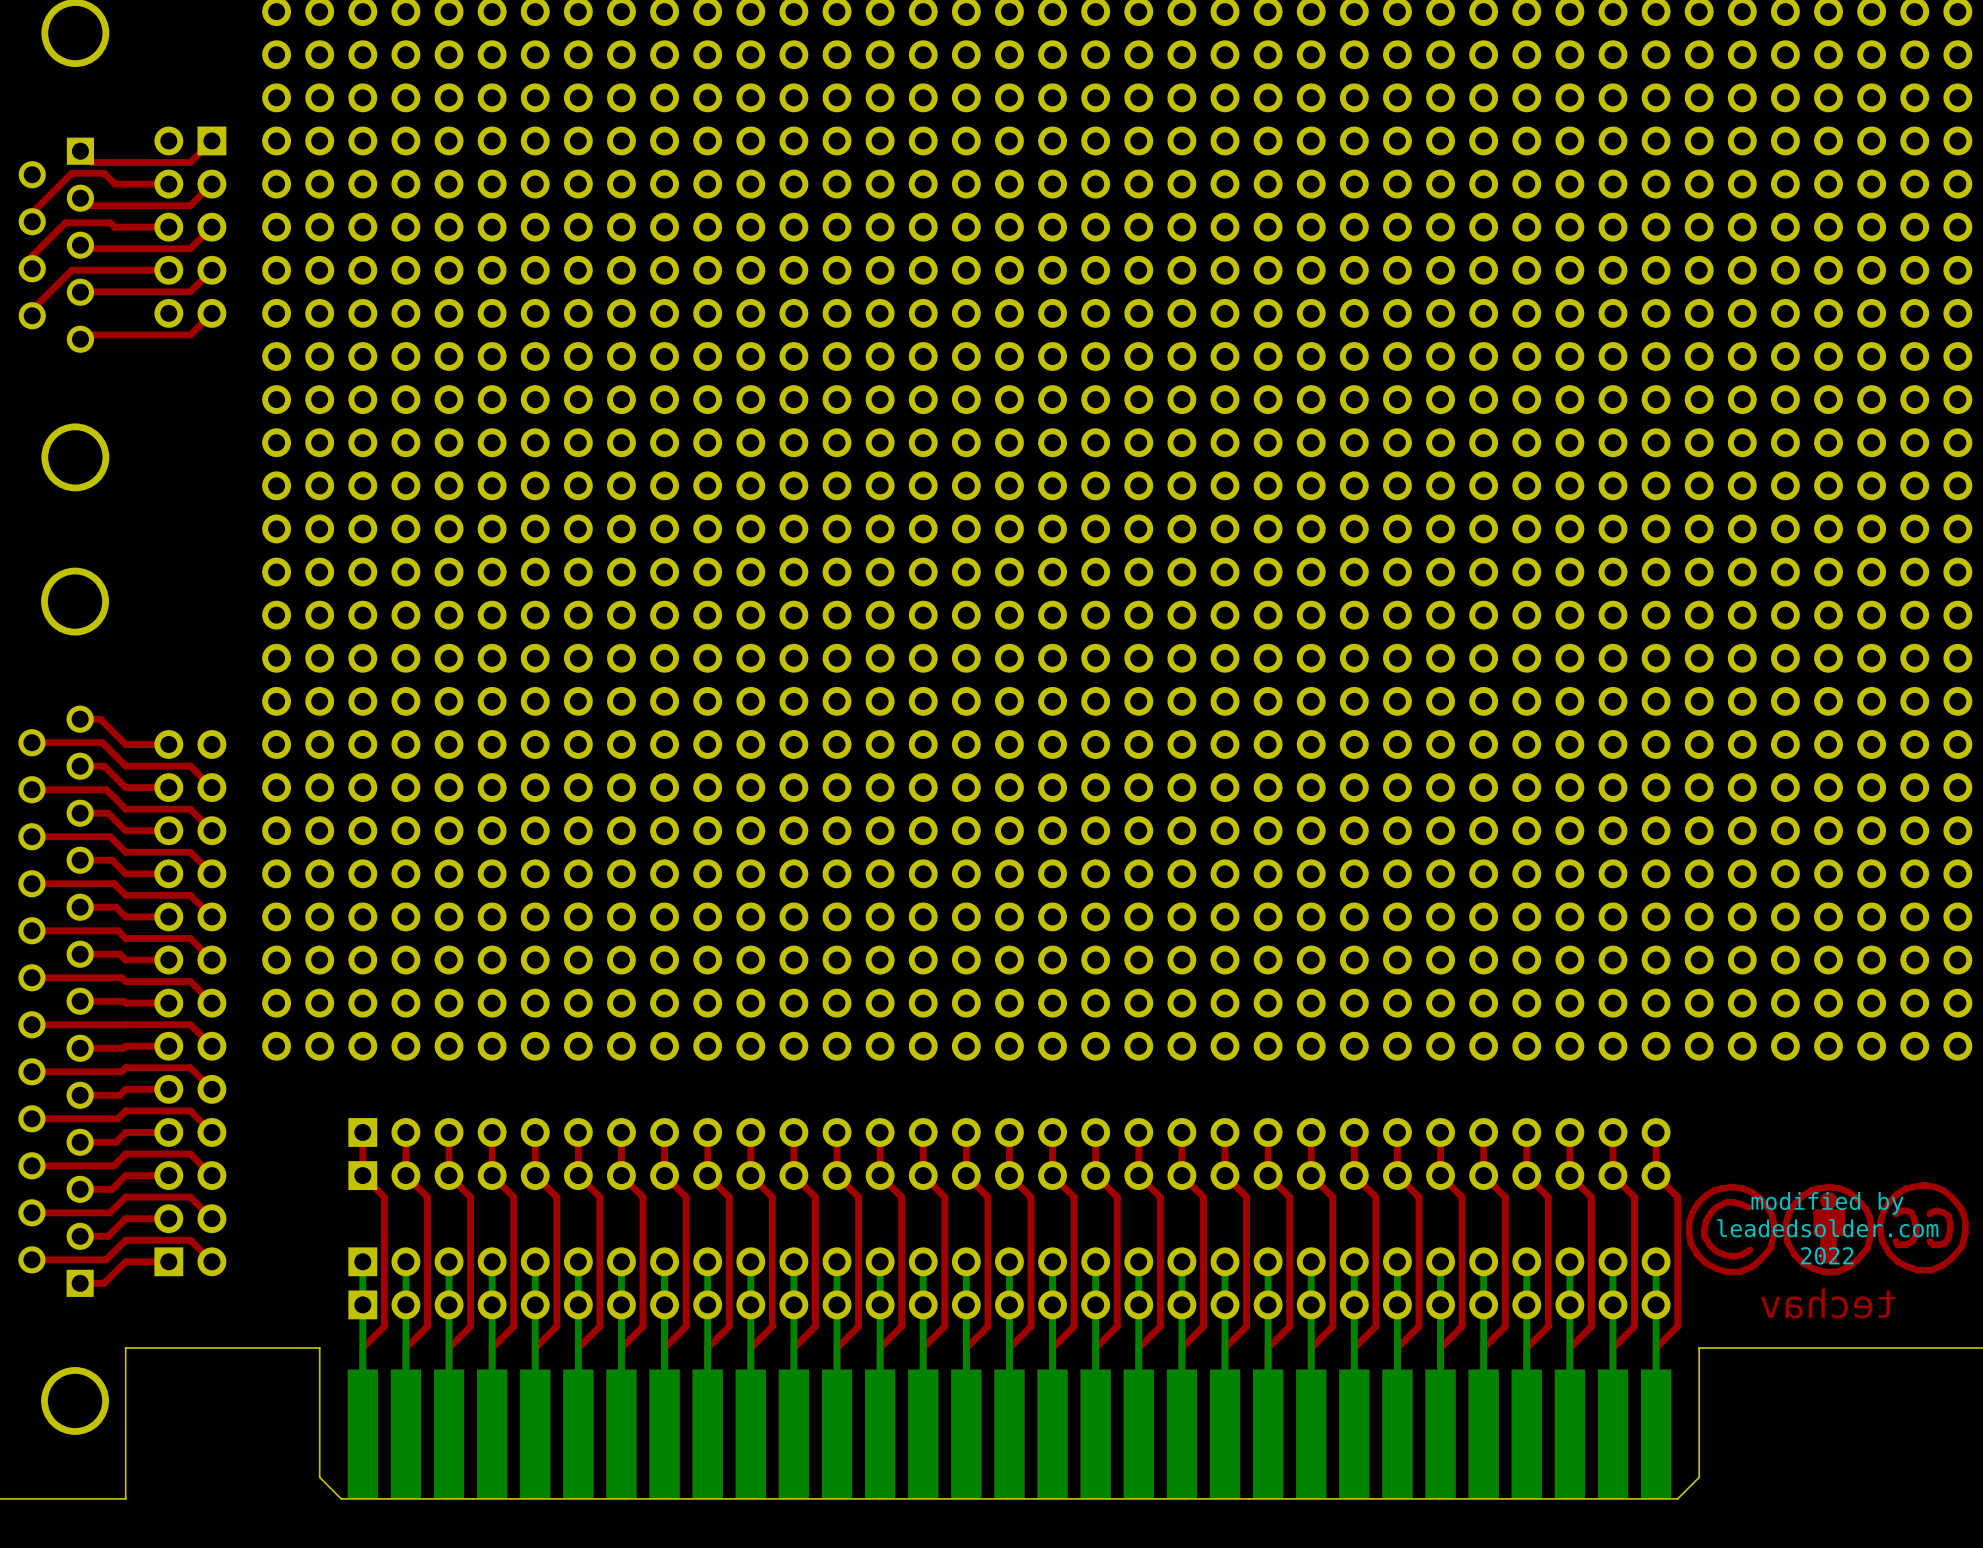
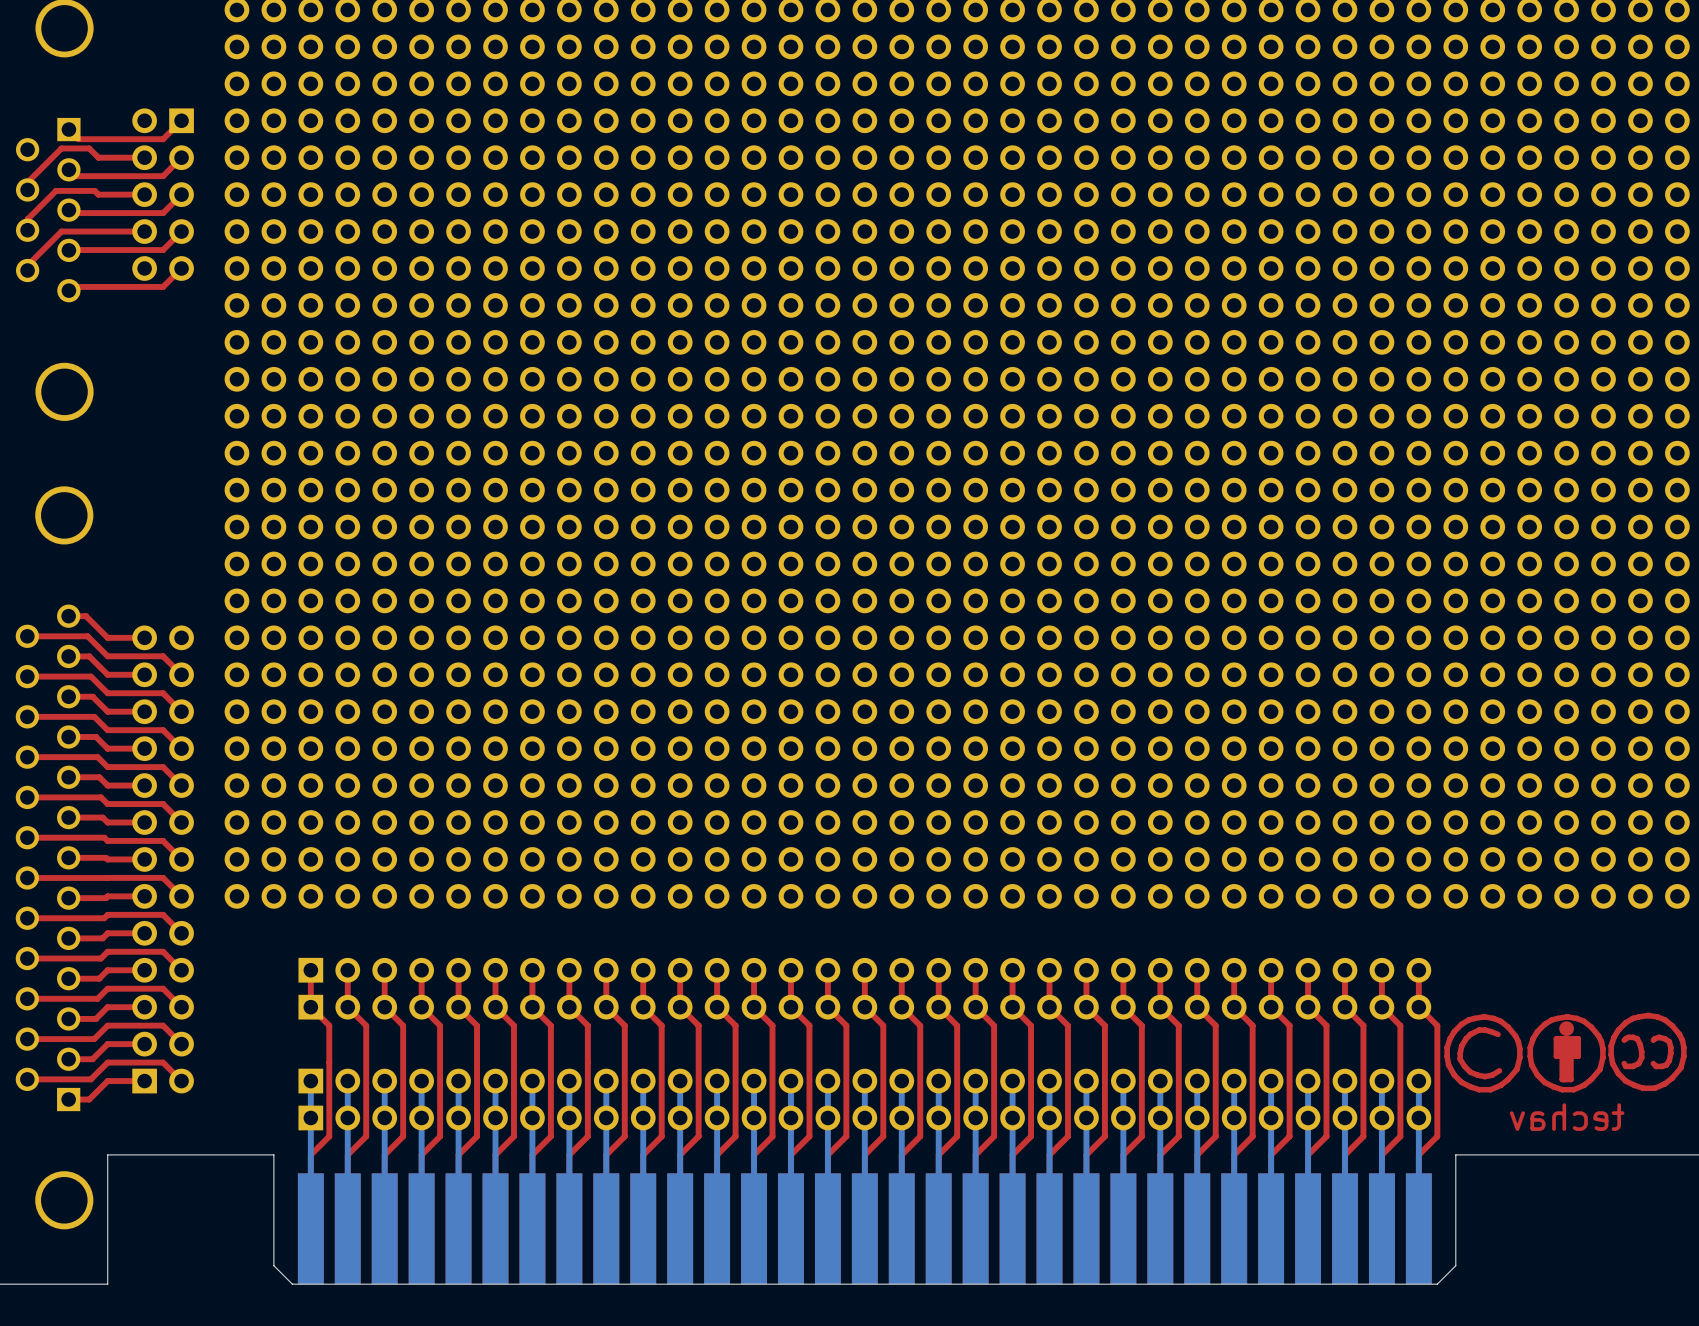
text: modified by (1827, 1203) -> none
text: leadedsolder.com (1827, 1228) -> none
text: 2022 (1827, 1255) -> none

